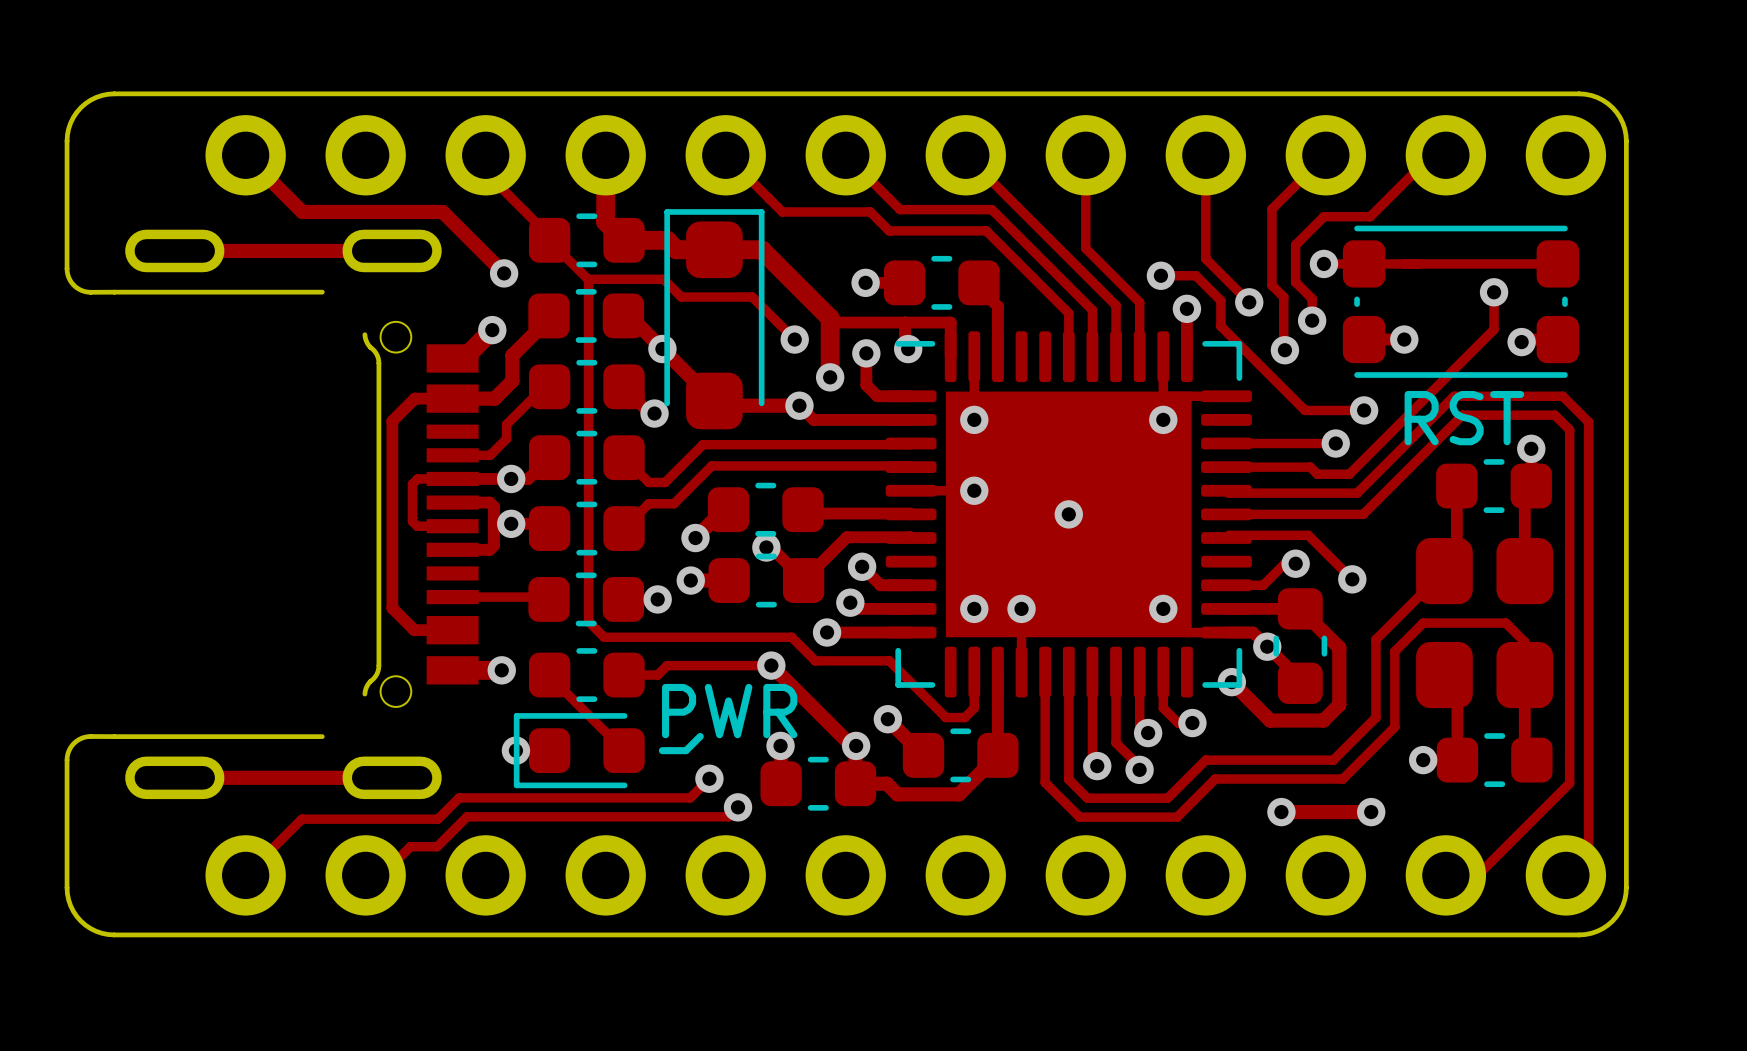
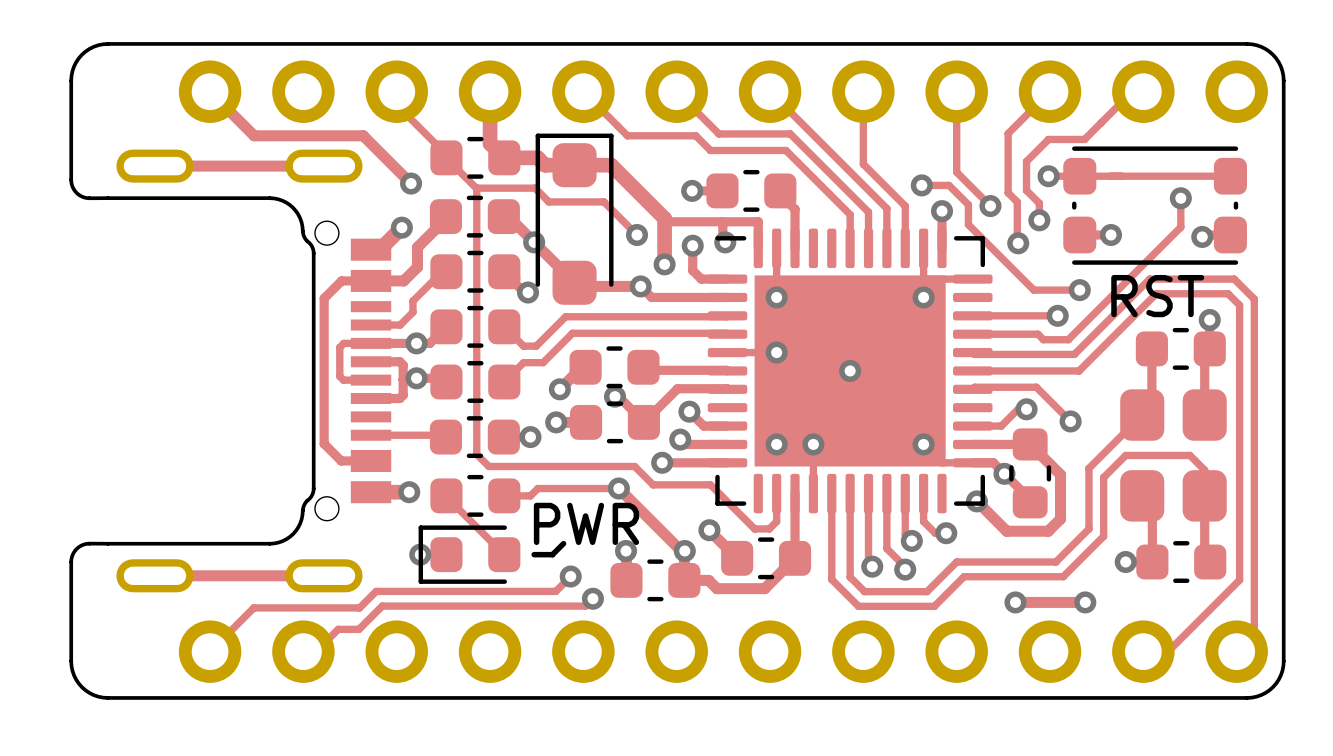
part footprint: [112, 229, 479, 800] -> [106, 149, 392, 593]

